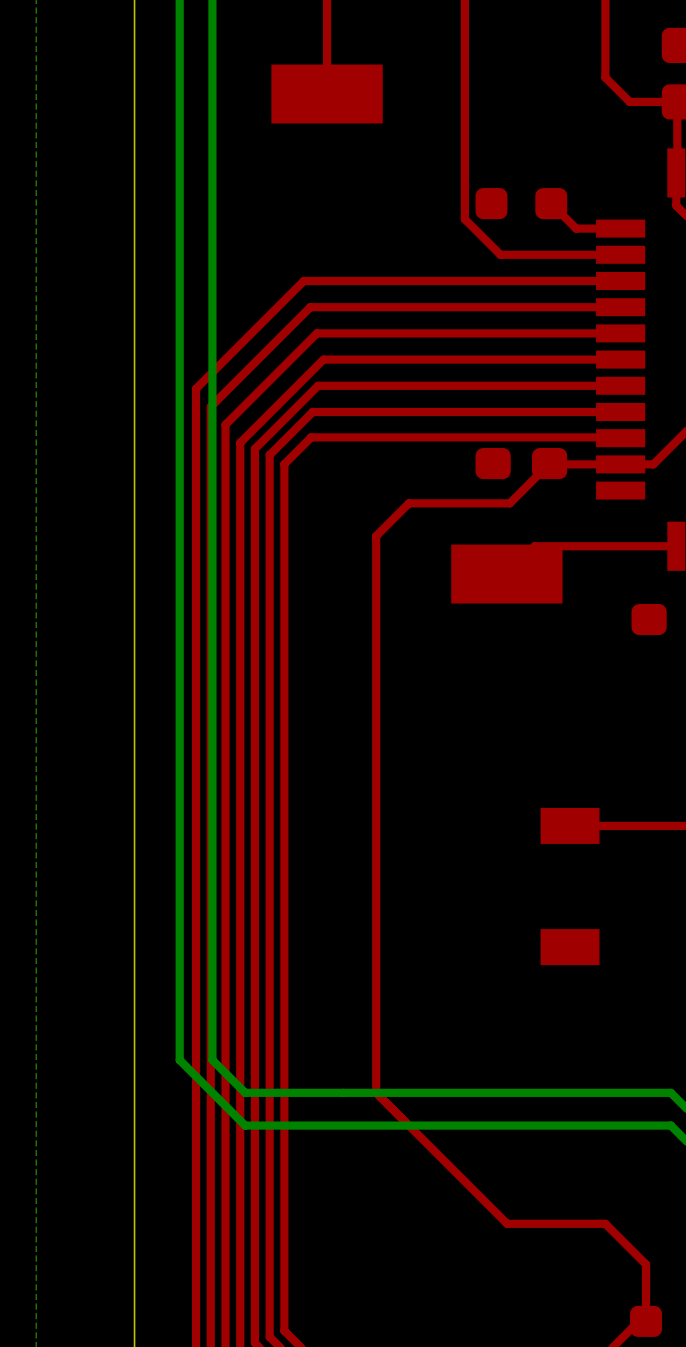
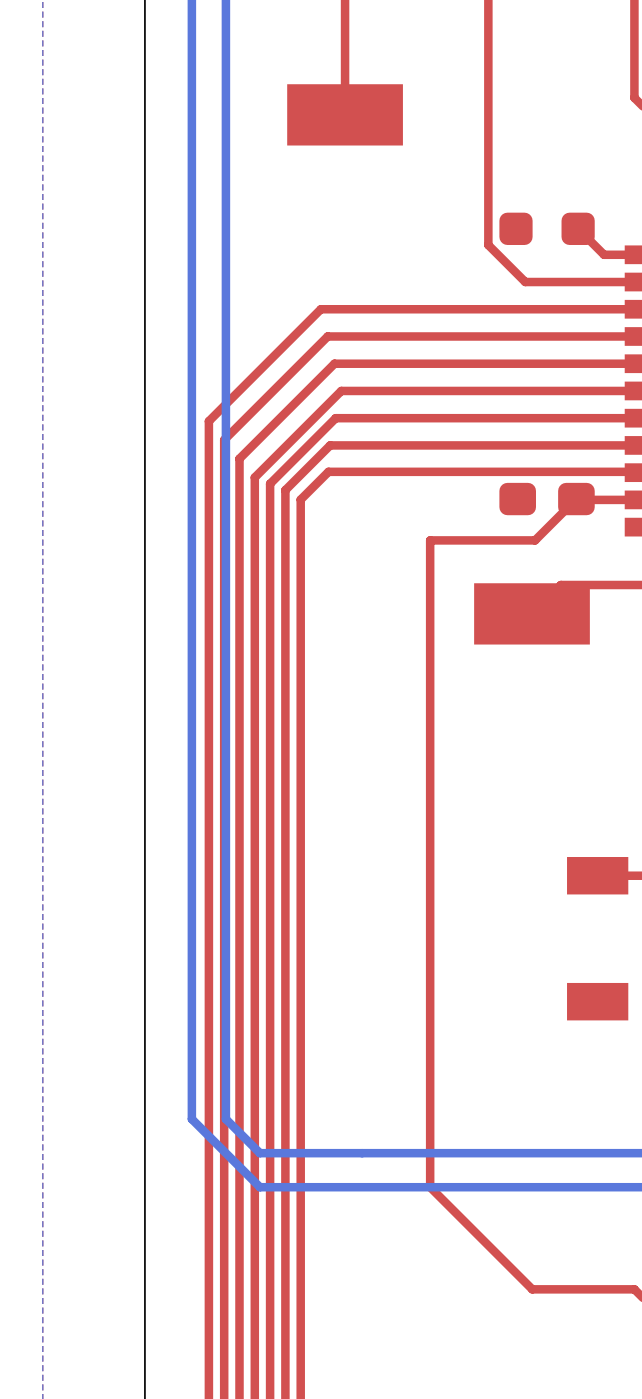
top track: (408, 503) (376, 536) (376, 1092) (408, 1125) -> (430, 540) (430, 1187)

